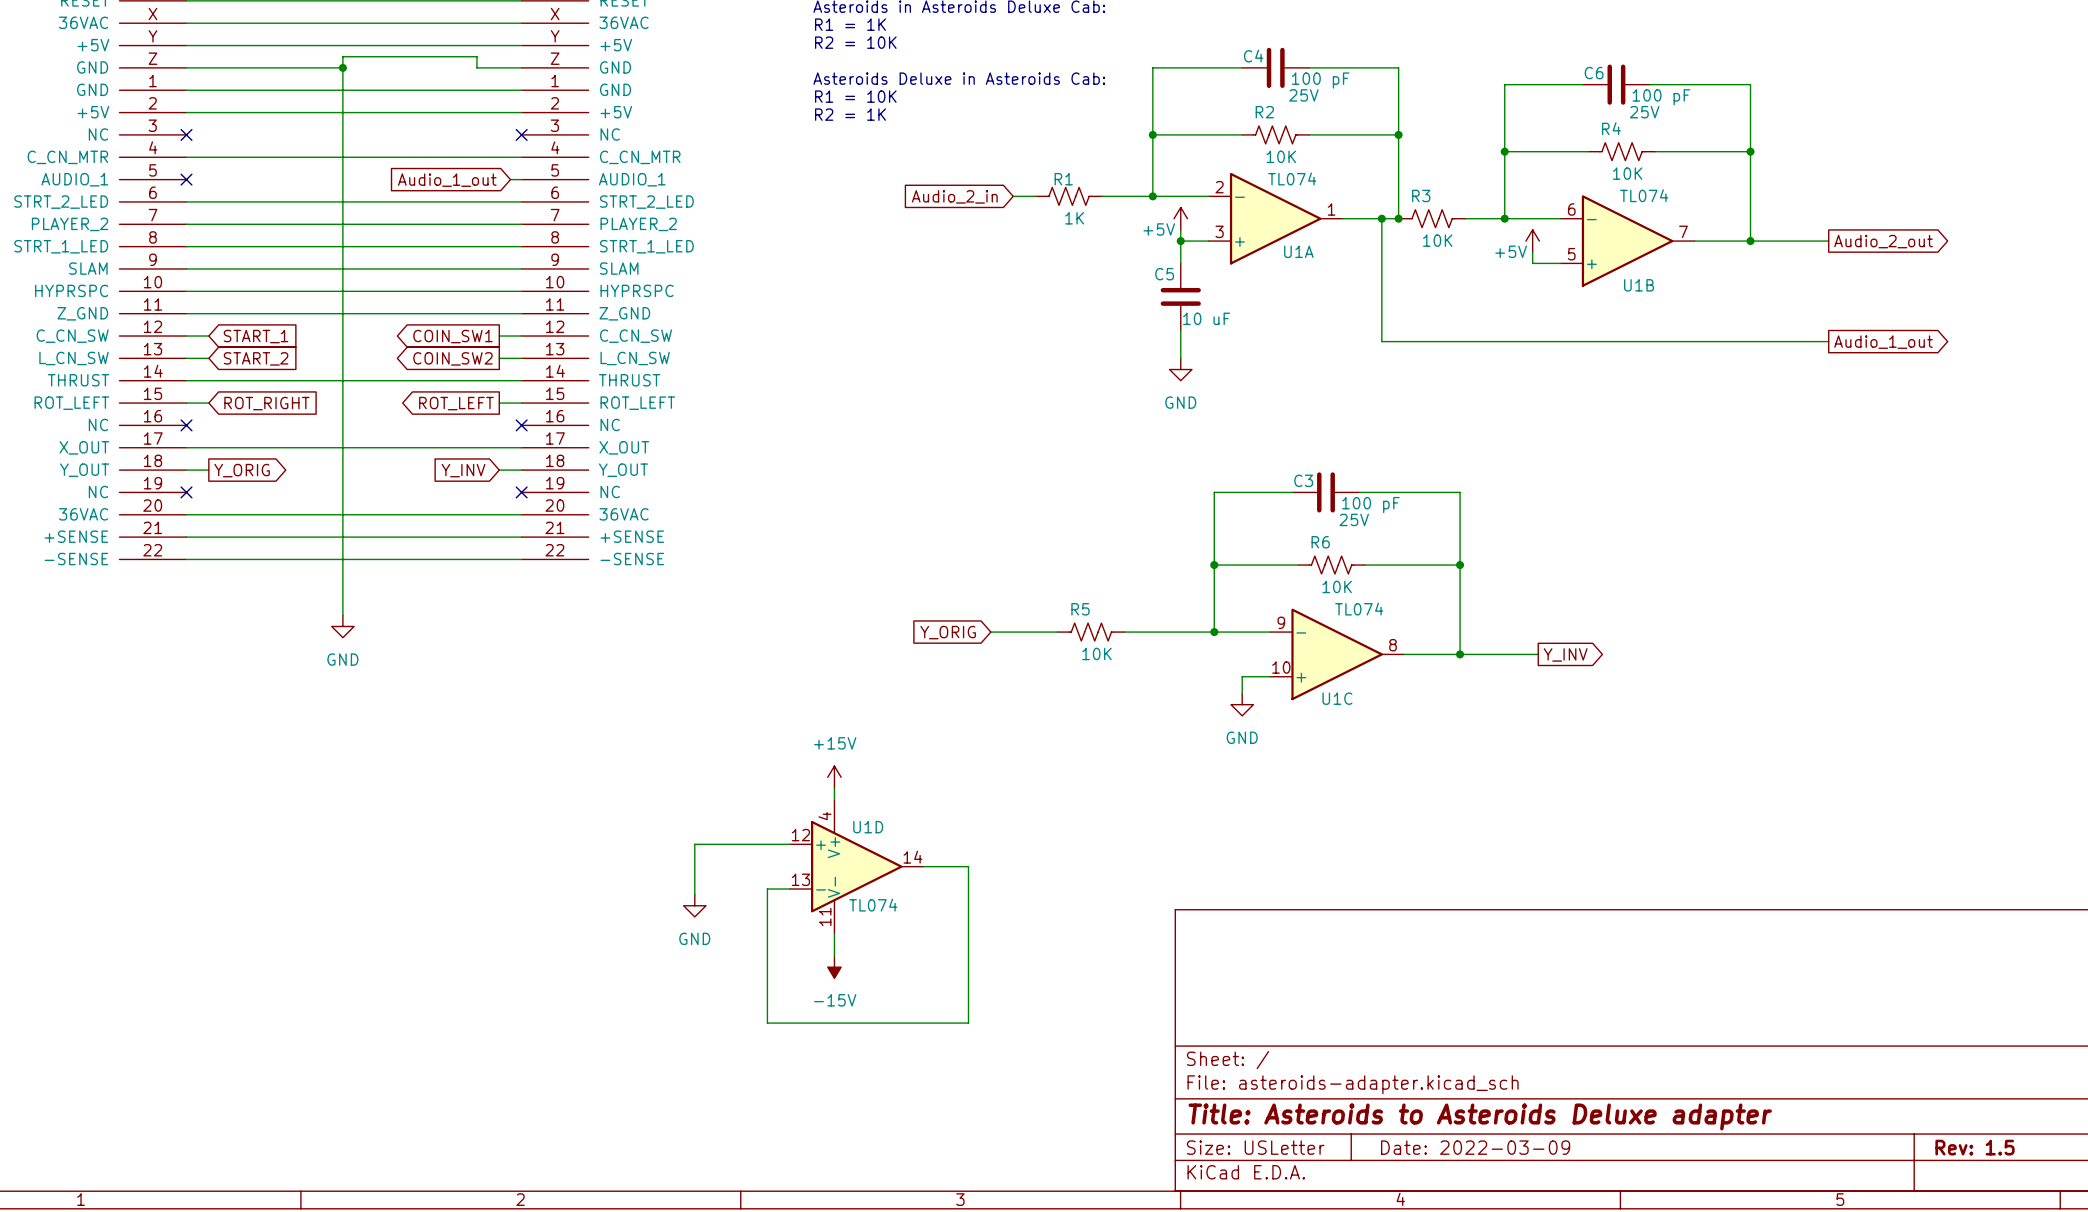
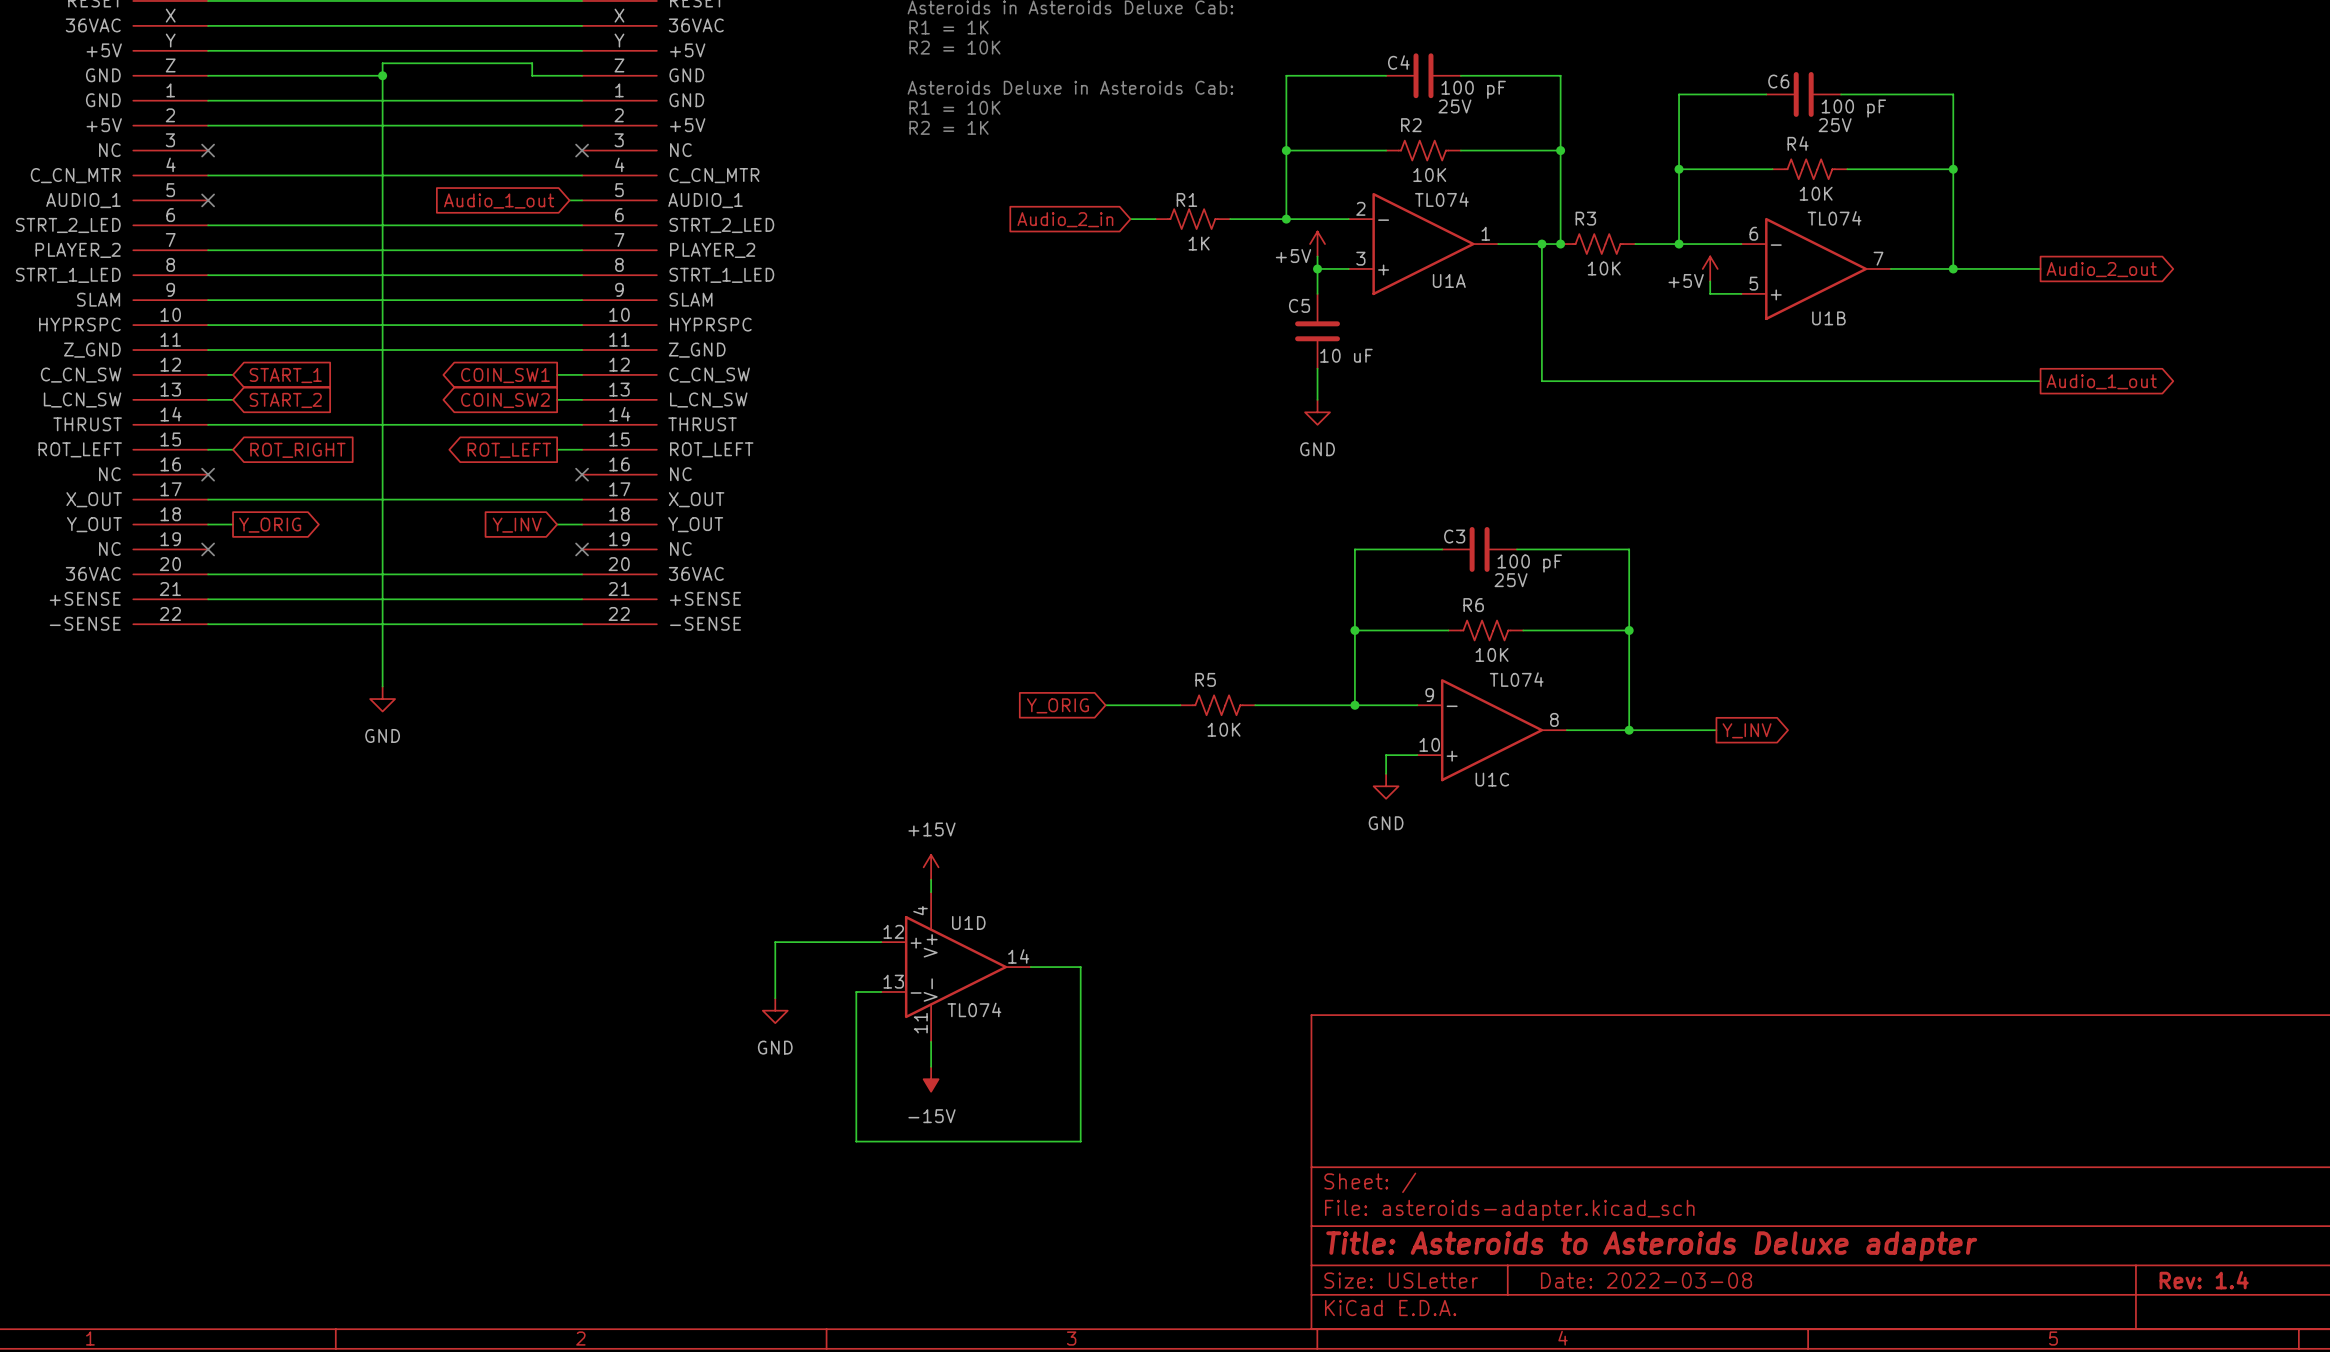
title block: Date: 2022-03-09 (1475, 1147) -> Date: 2022-03-08 (1646, 1280)
title block: Rev: 1.5 (1975, 1147) -> Rev: 1.4 (2204, 1280)

